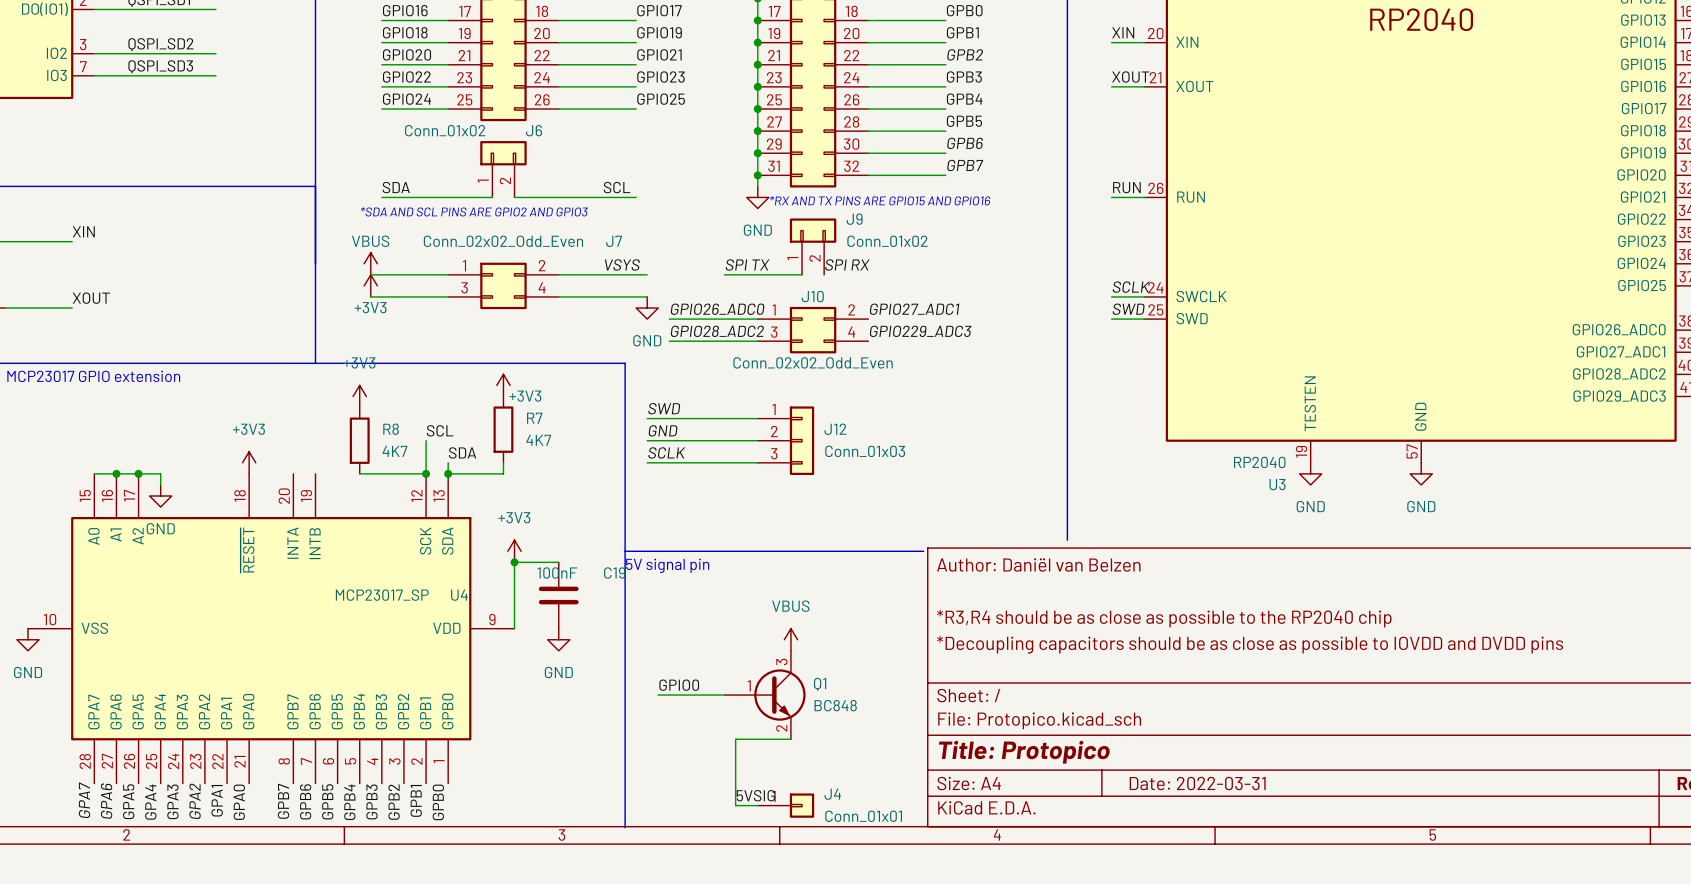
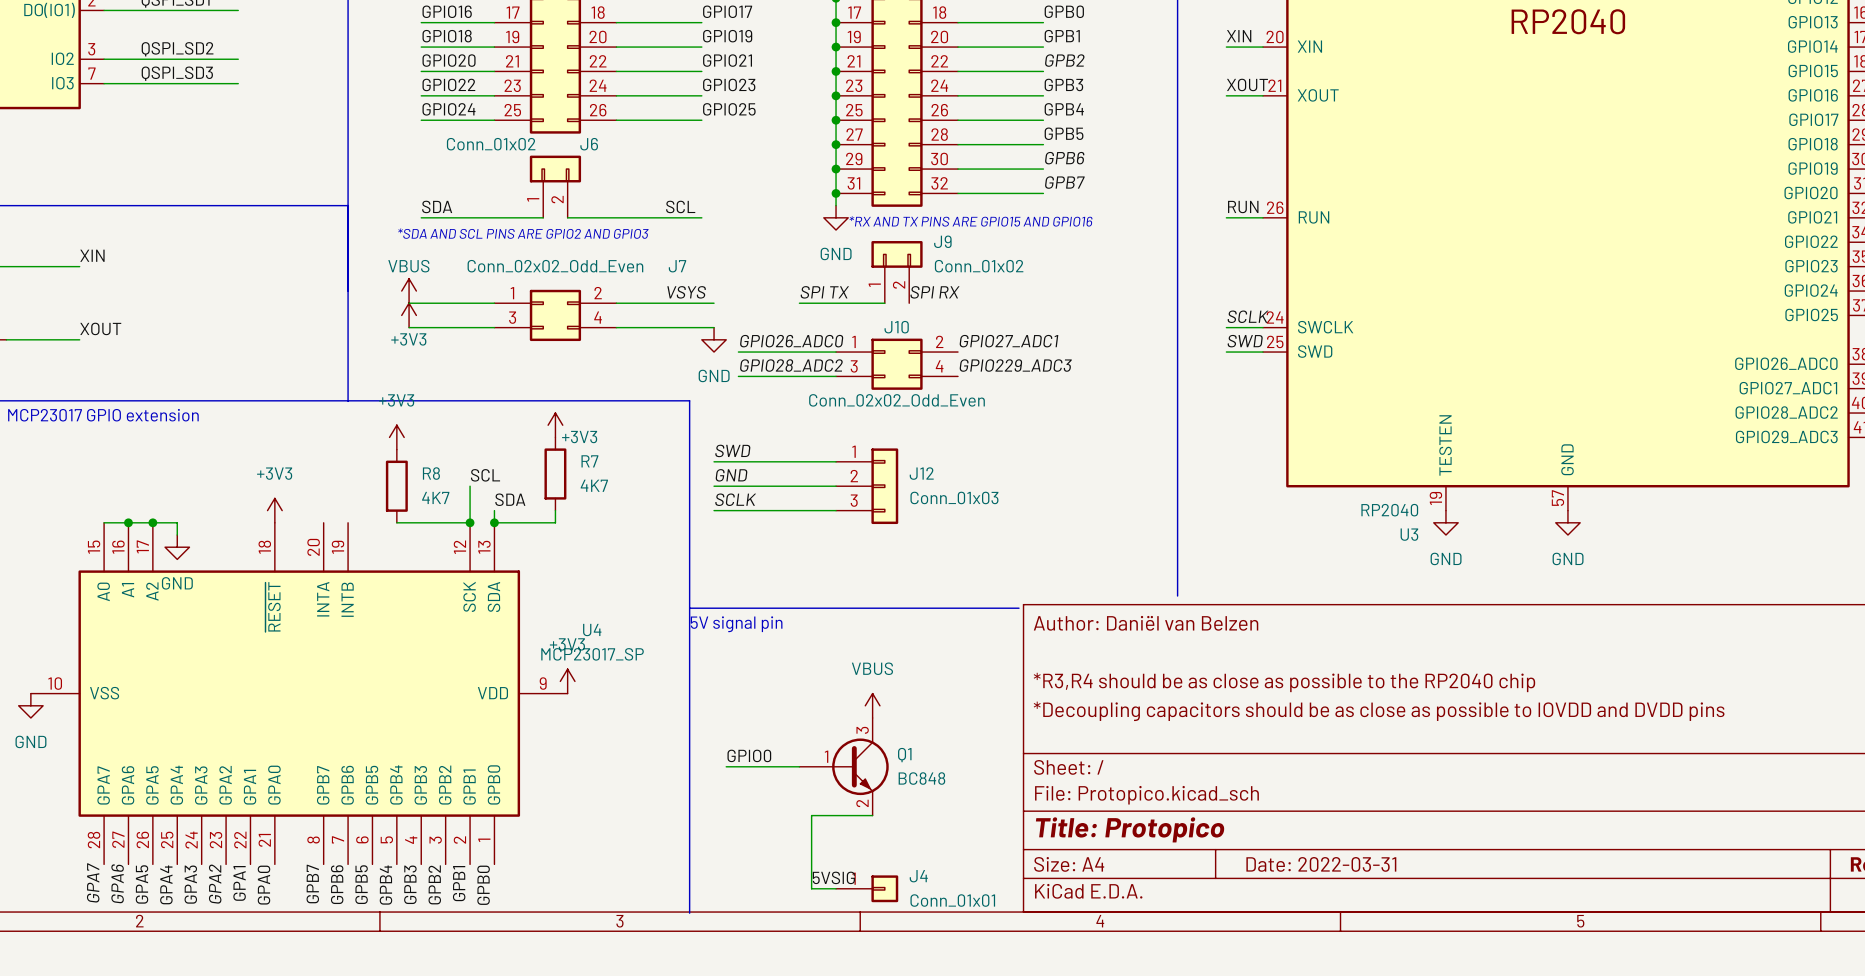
power symbol position: +3V3 (514, 551) -> +3V3 (567, 681)
junction: (514, 562) -> none
wire: (558, 562) (514, 562) (514, 628) -> none
U4 value position: MCP23017_SP (382, 595) -> MCP23017_SP (592, 654)
U4 name position: U4 (459, 595) -> U4 (592, 630)
C19: 100nF (558, 595) -> none
power symbol: GND (558, 639) -> none

